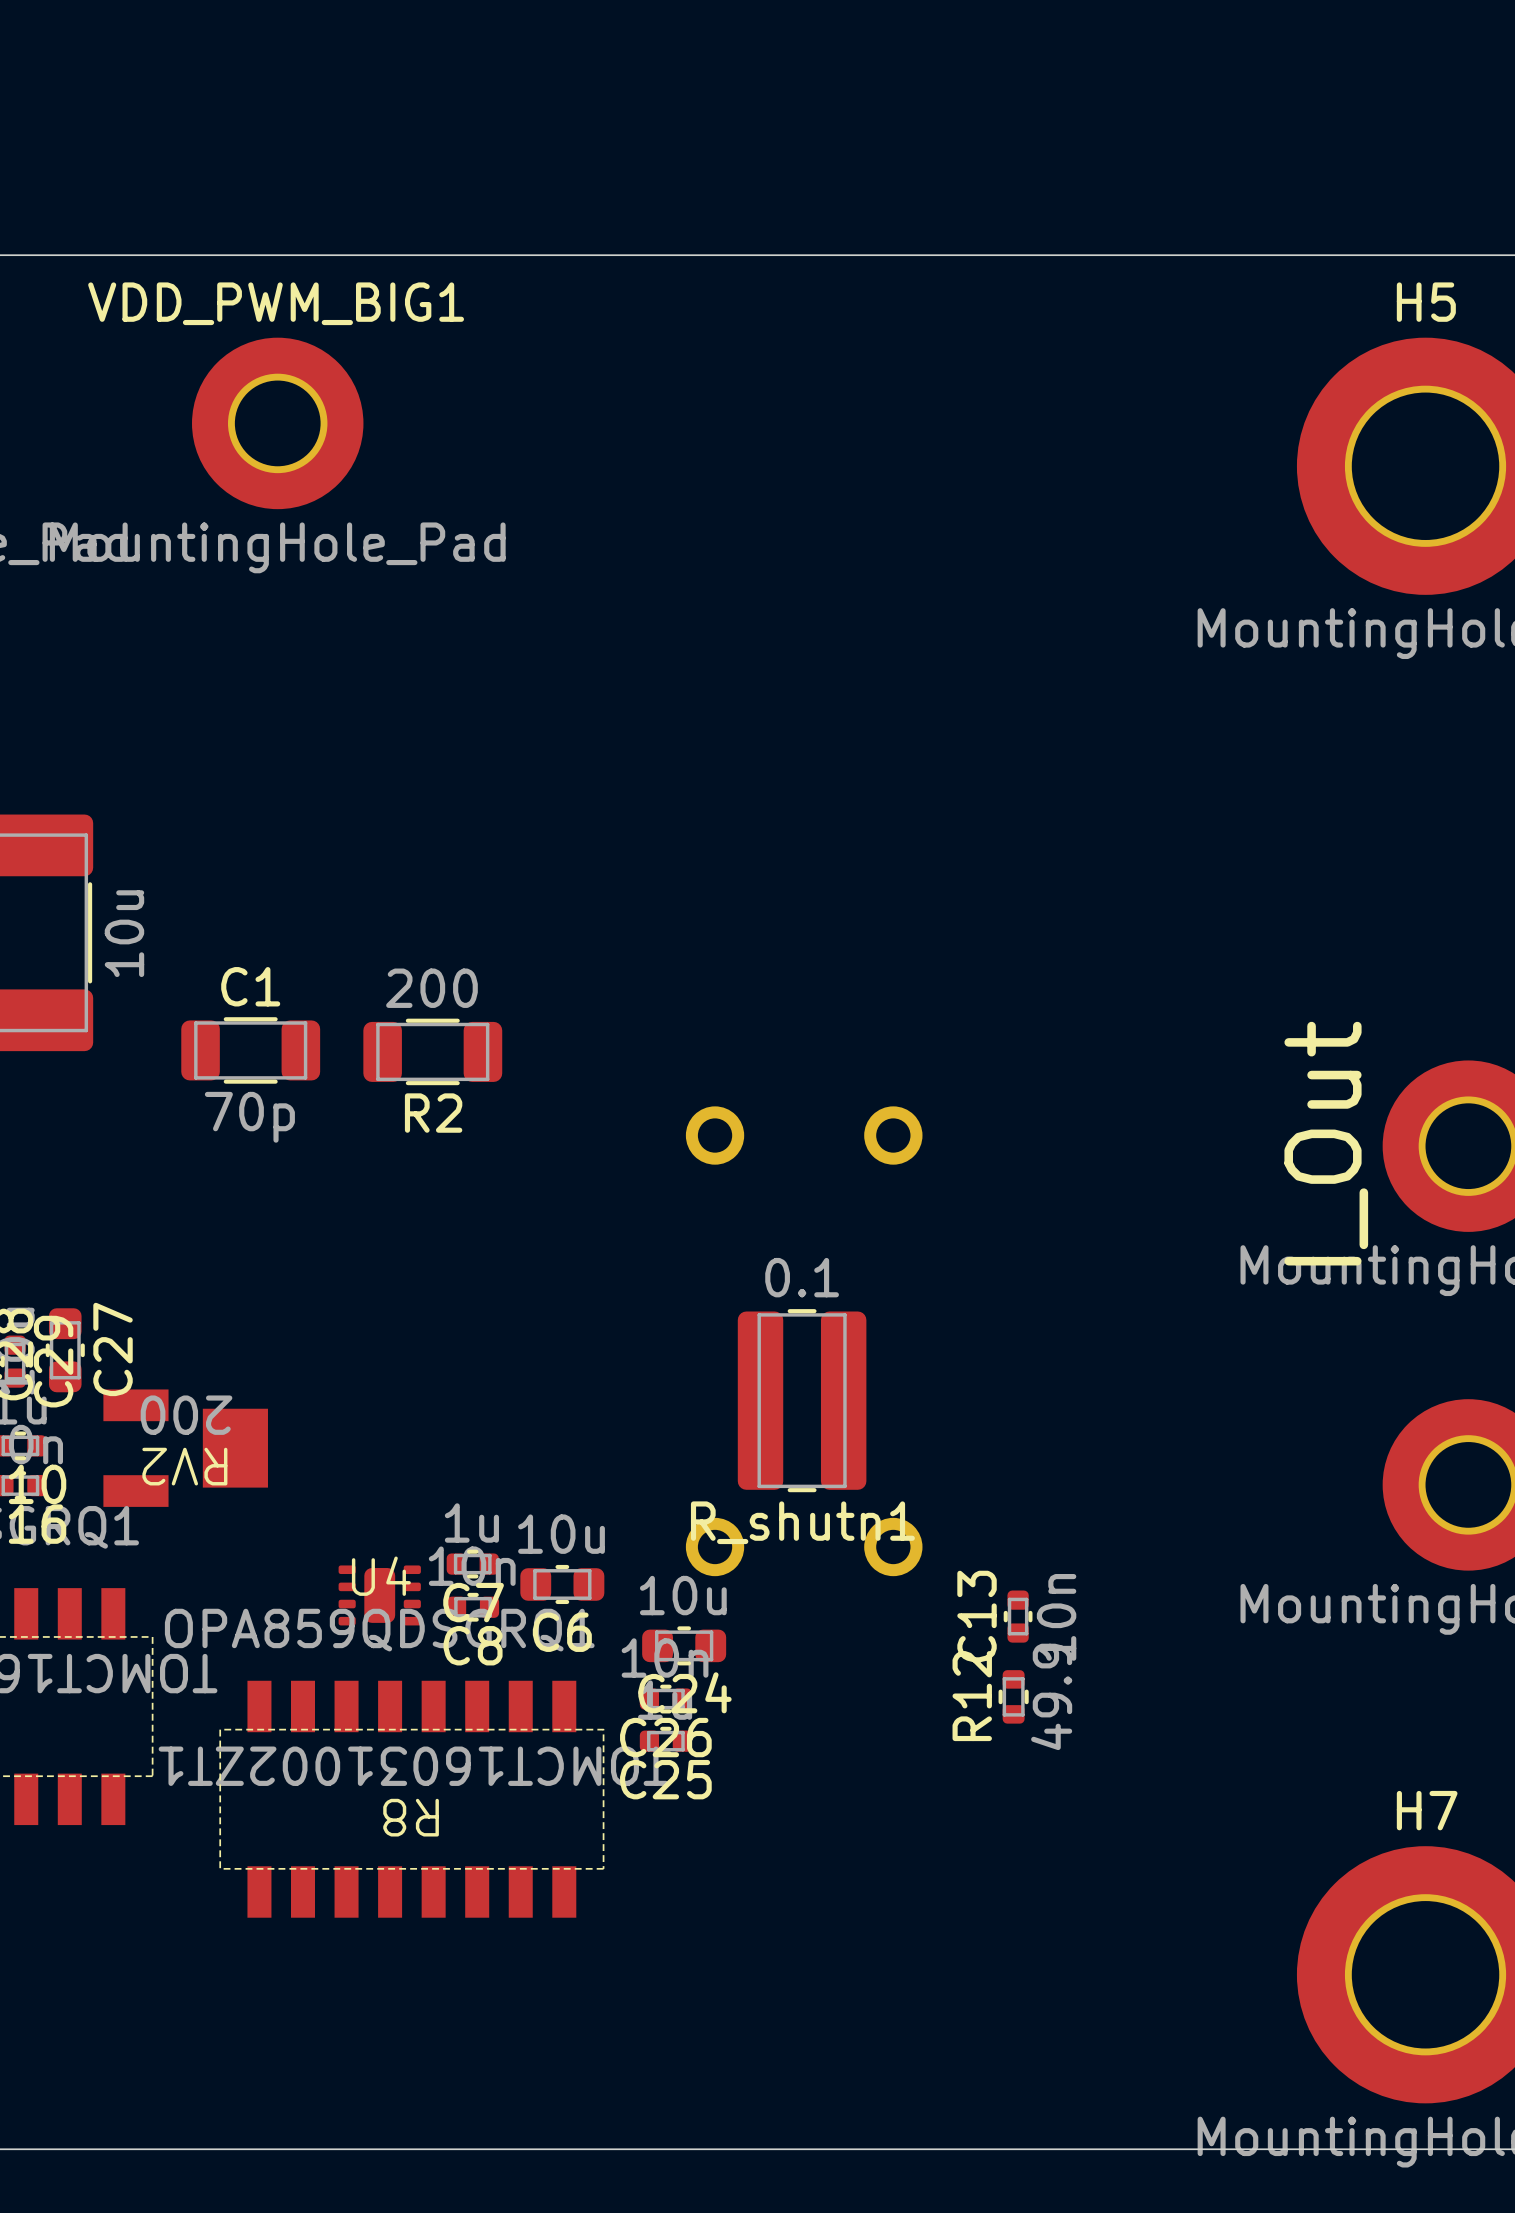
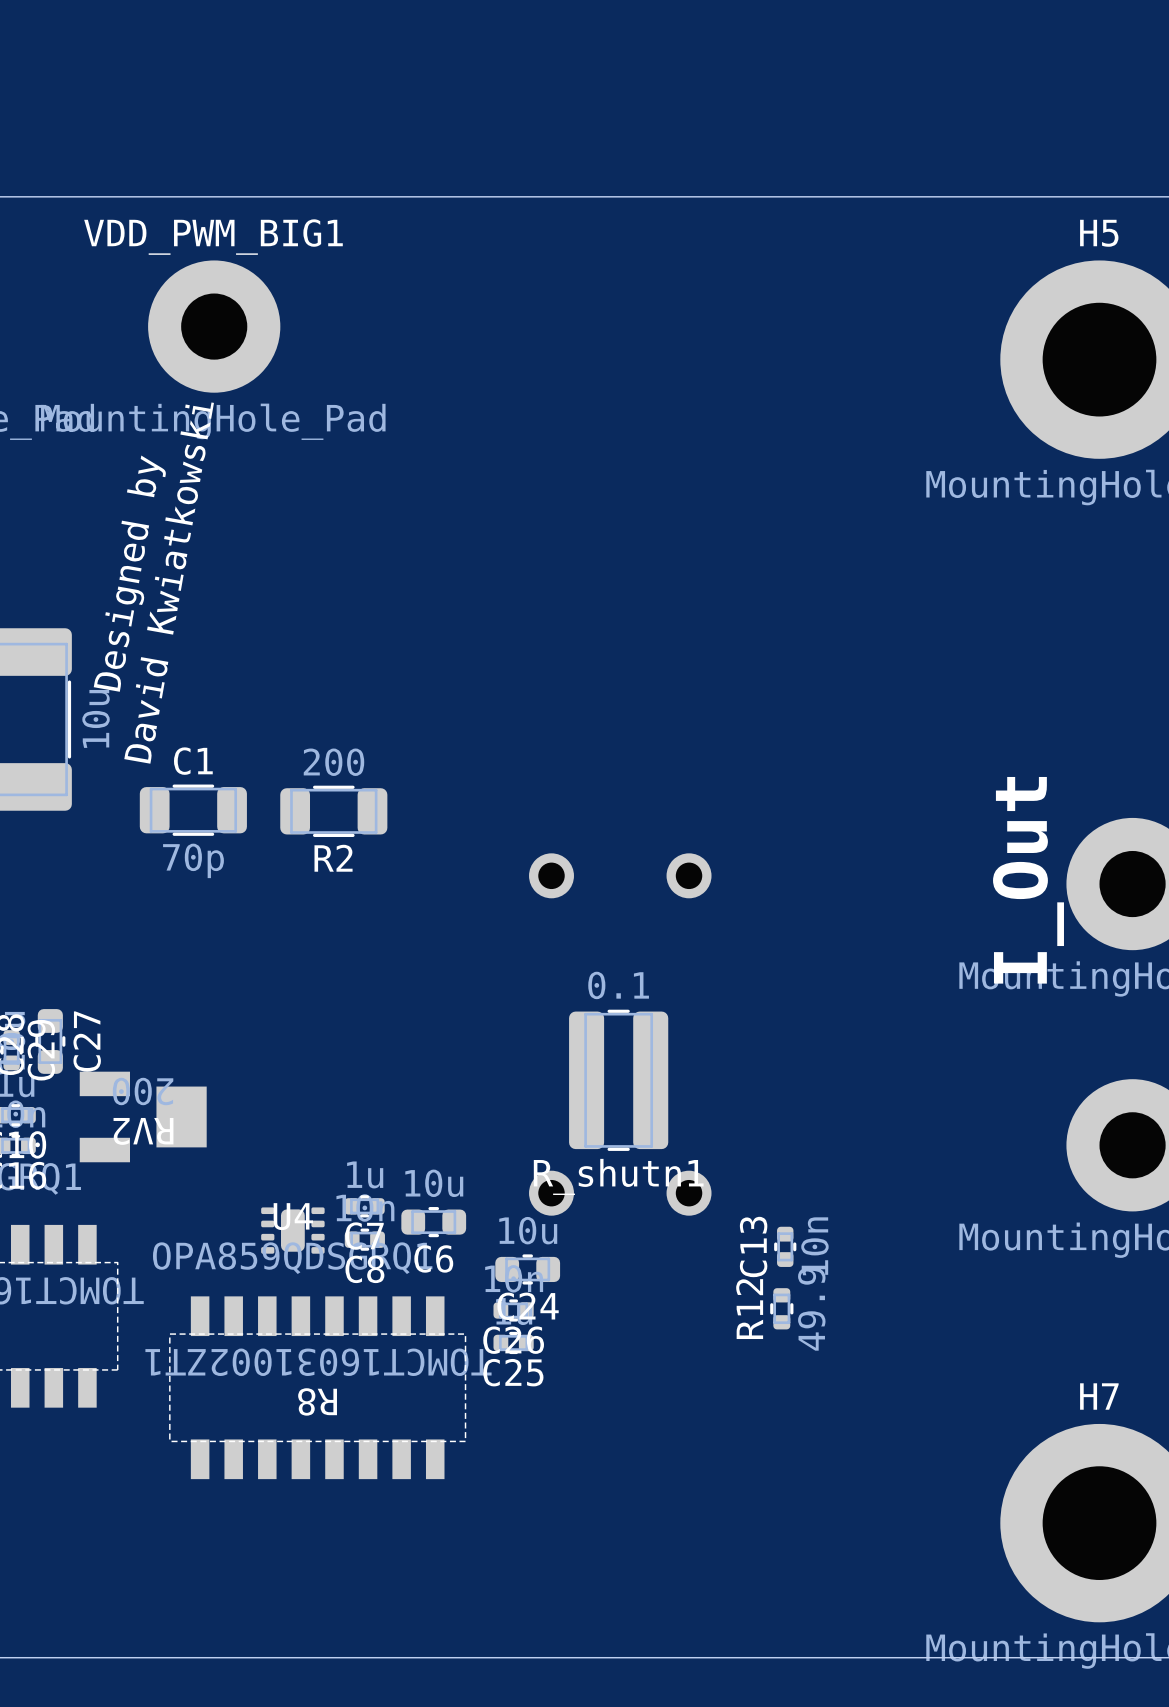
text: none -> Designed by (129, 573)
text: none -> David Kwiatkowski (169, 583)

